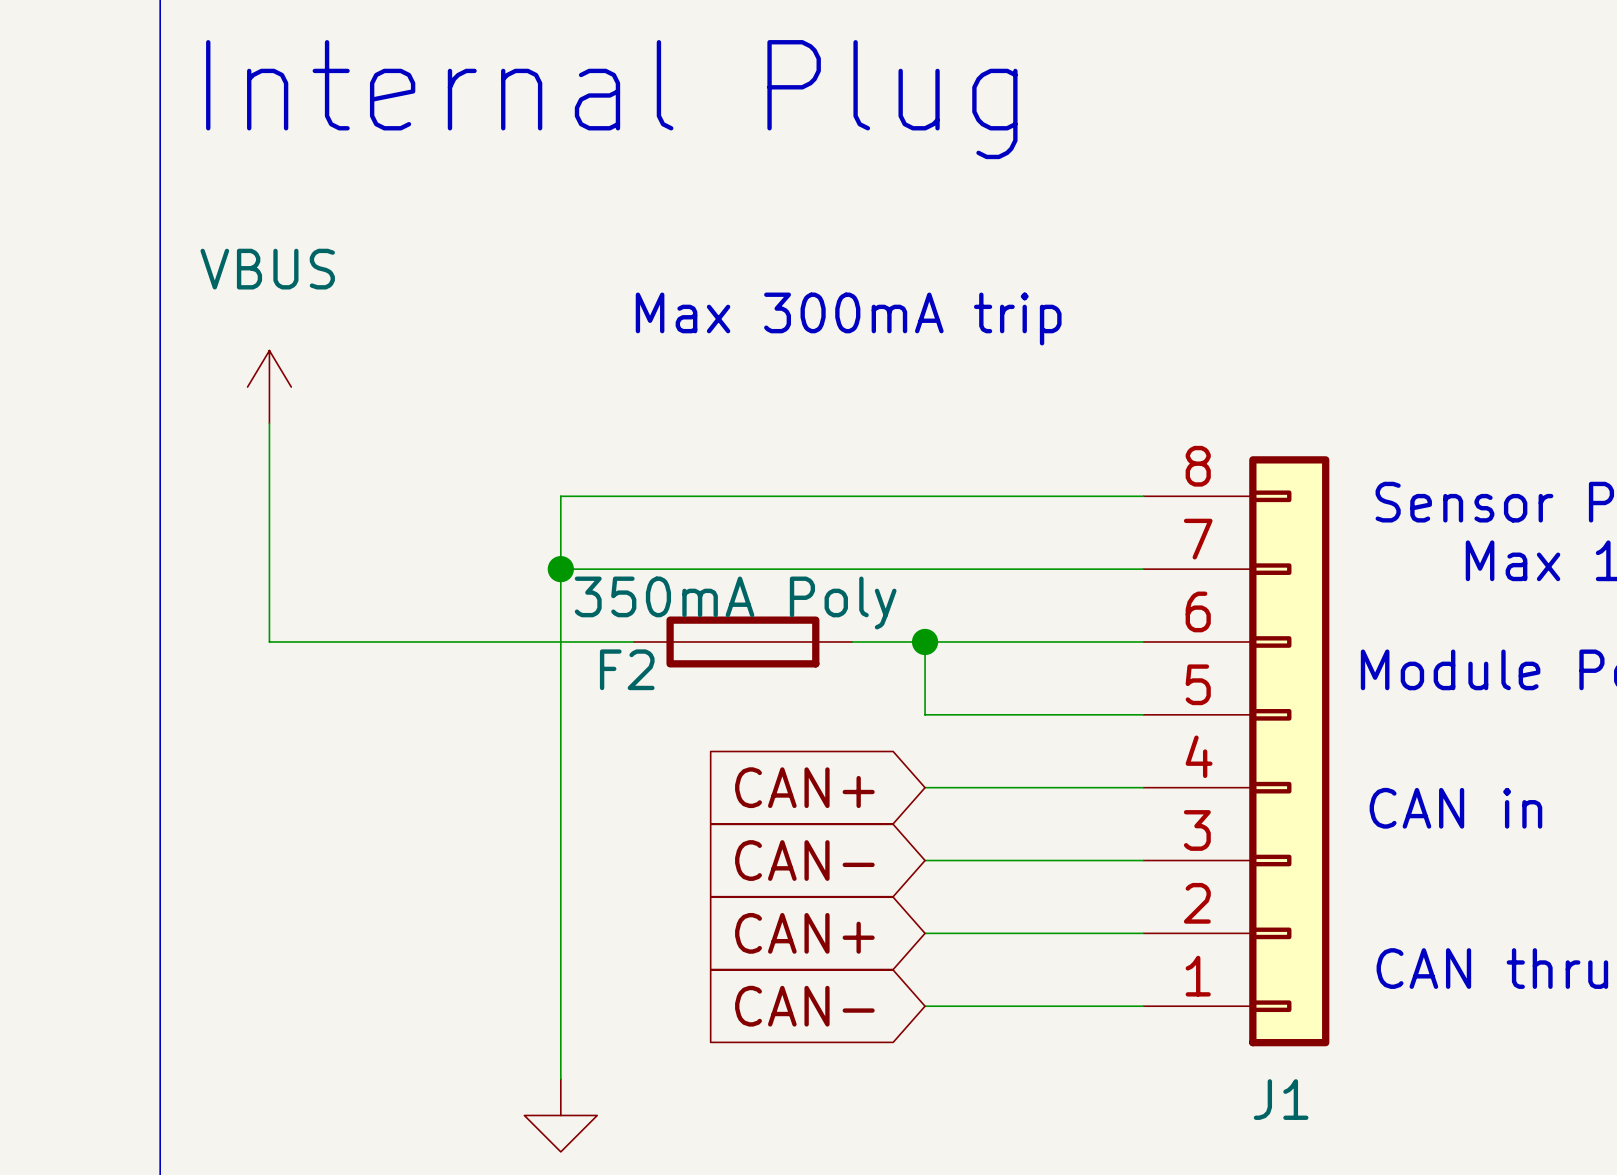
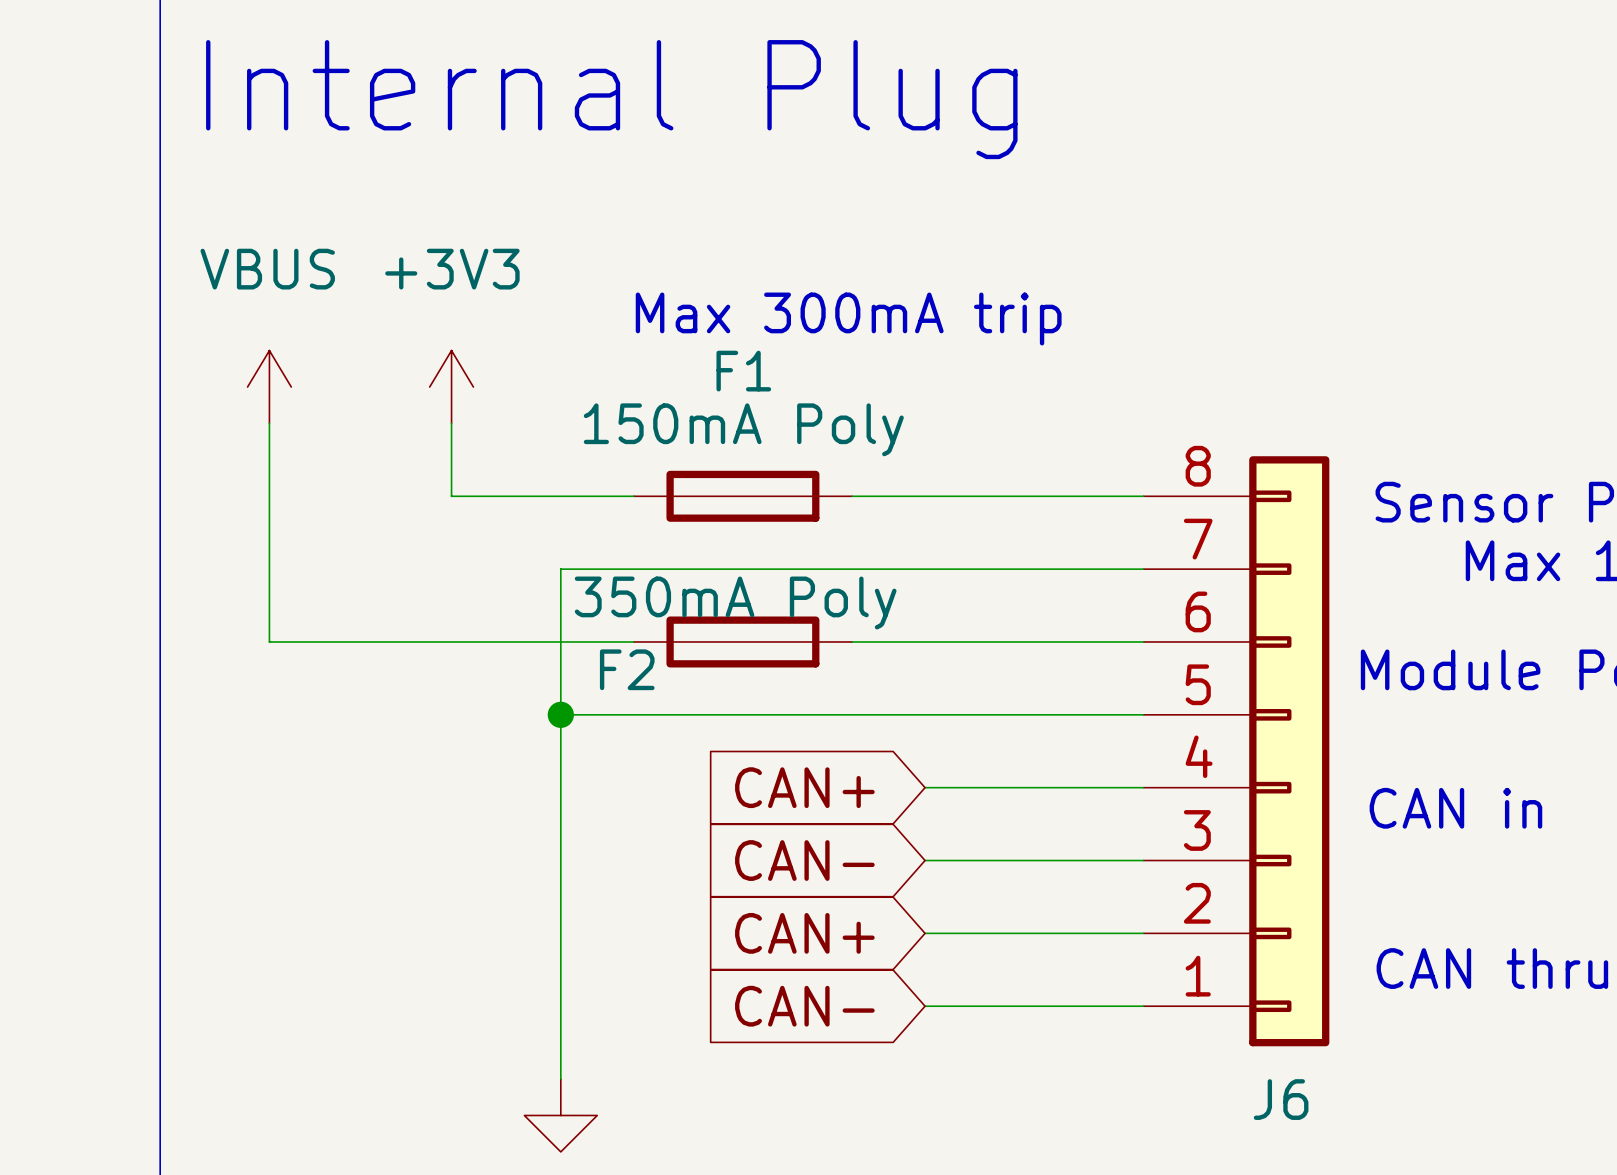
power symbol: none -> +3V3 (451, 387)
wire: (560, 496) (560, 569) -> (560, 496) (451, 496) (451, 423)
F1: none -> 150mA Poly (742, 496)
junction position: (560, 569) -> (560, 714)
wire: (925, 641) (925, 714) -> (560, 714) (925, 714)
junction: (925, 641) -> none
J1 name: J1 (1281, 1099) -> J6 (1281, 1099)

